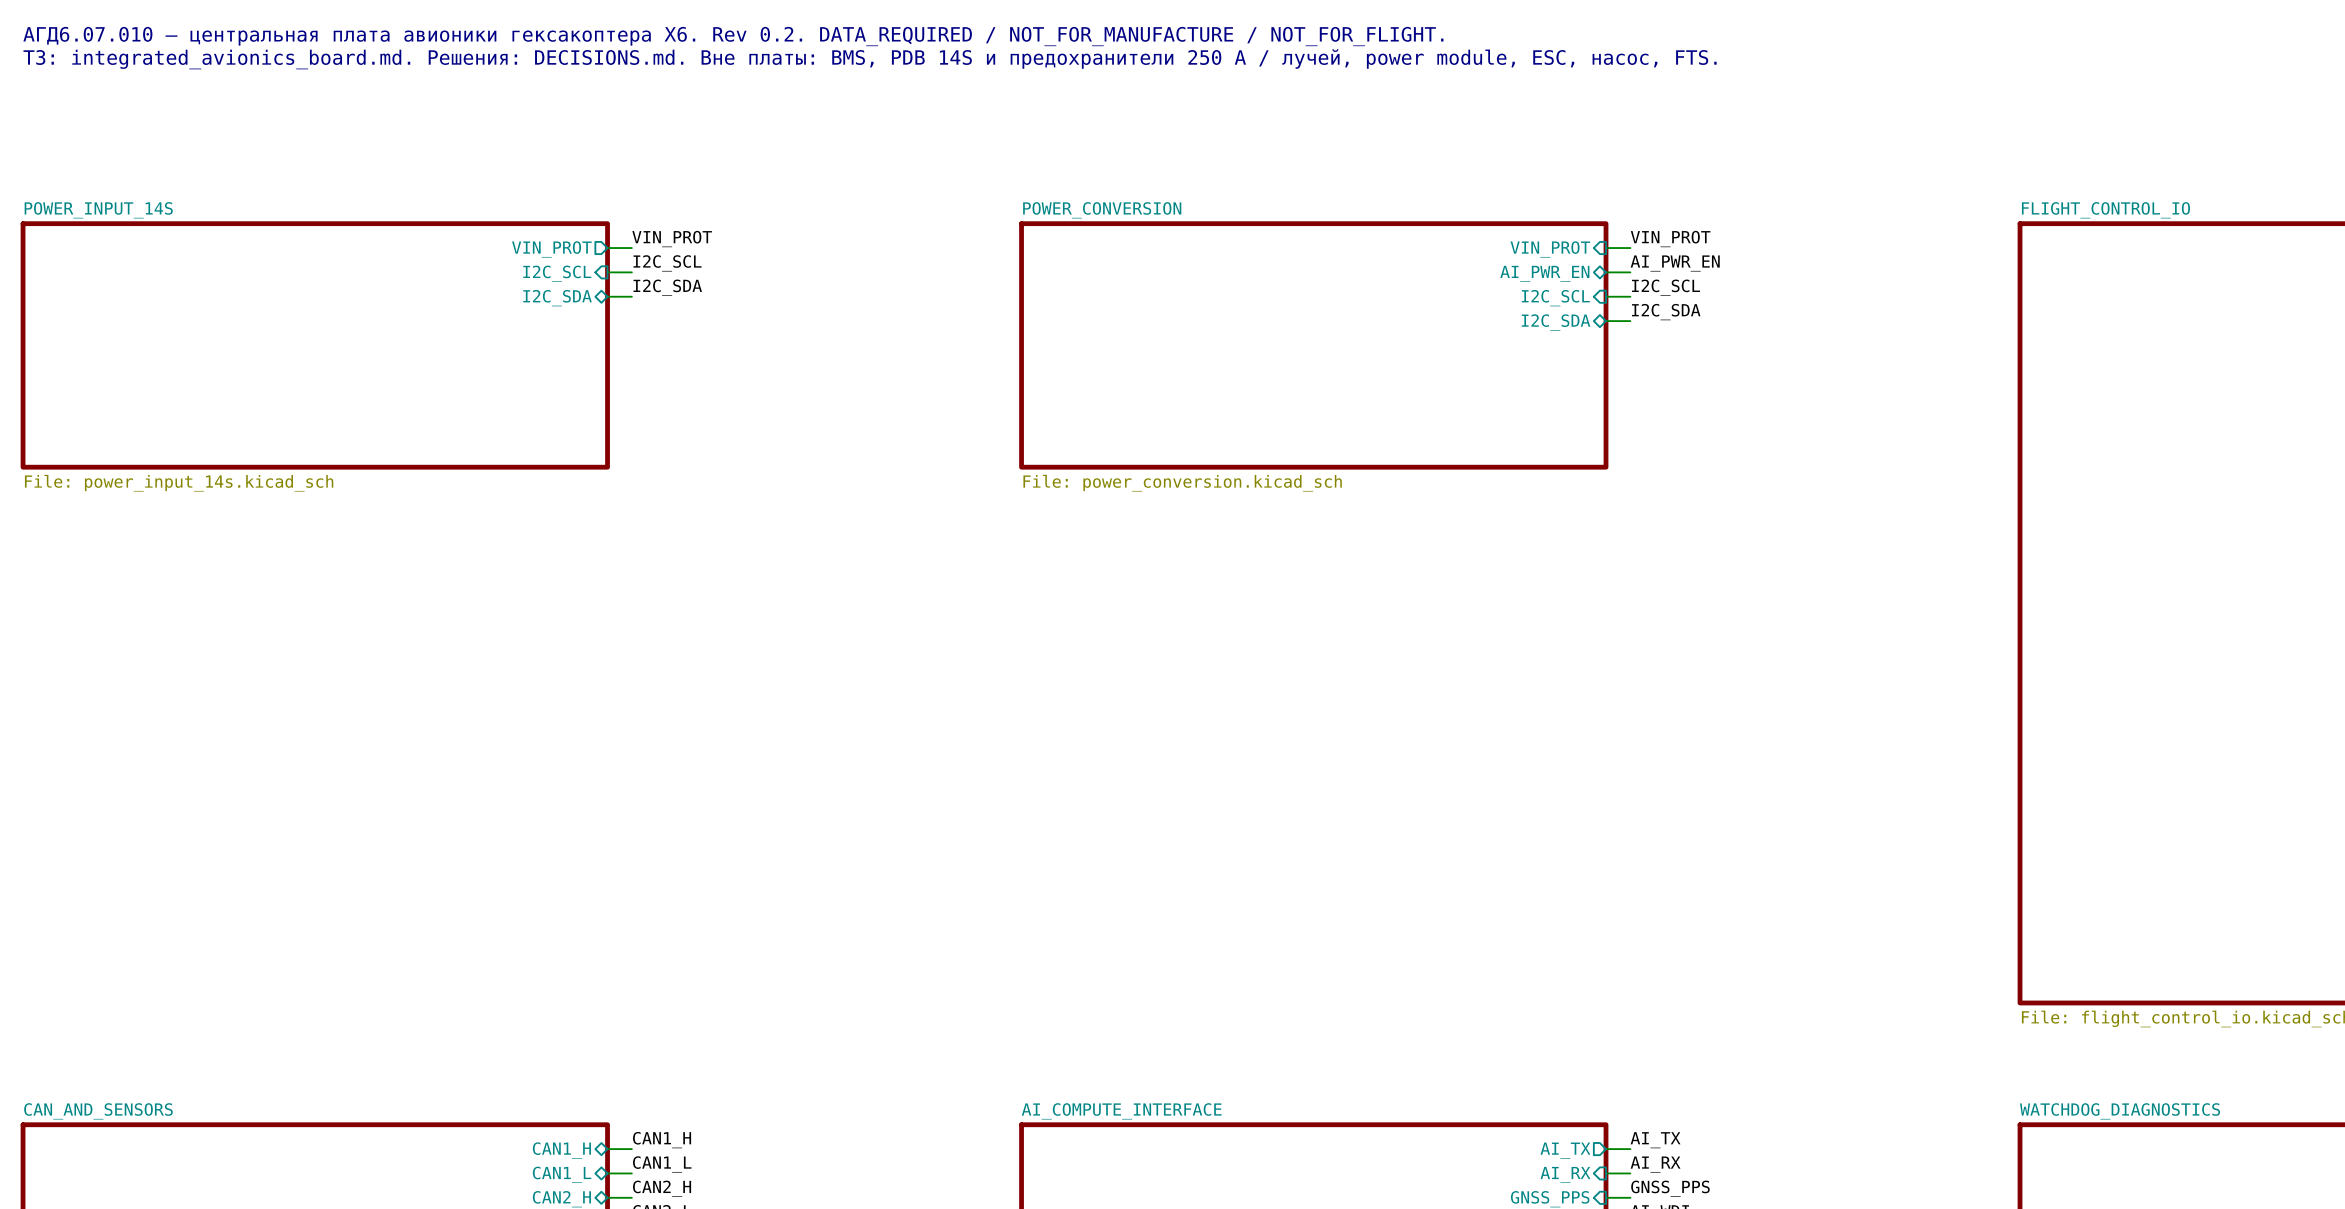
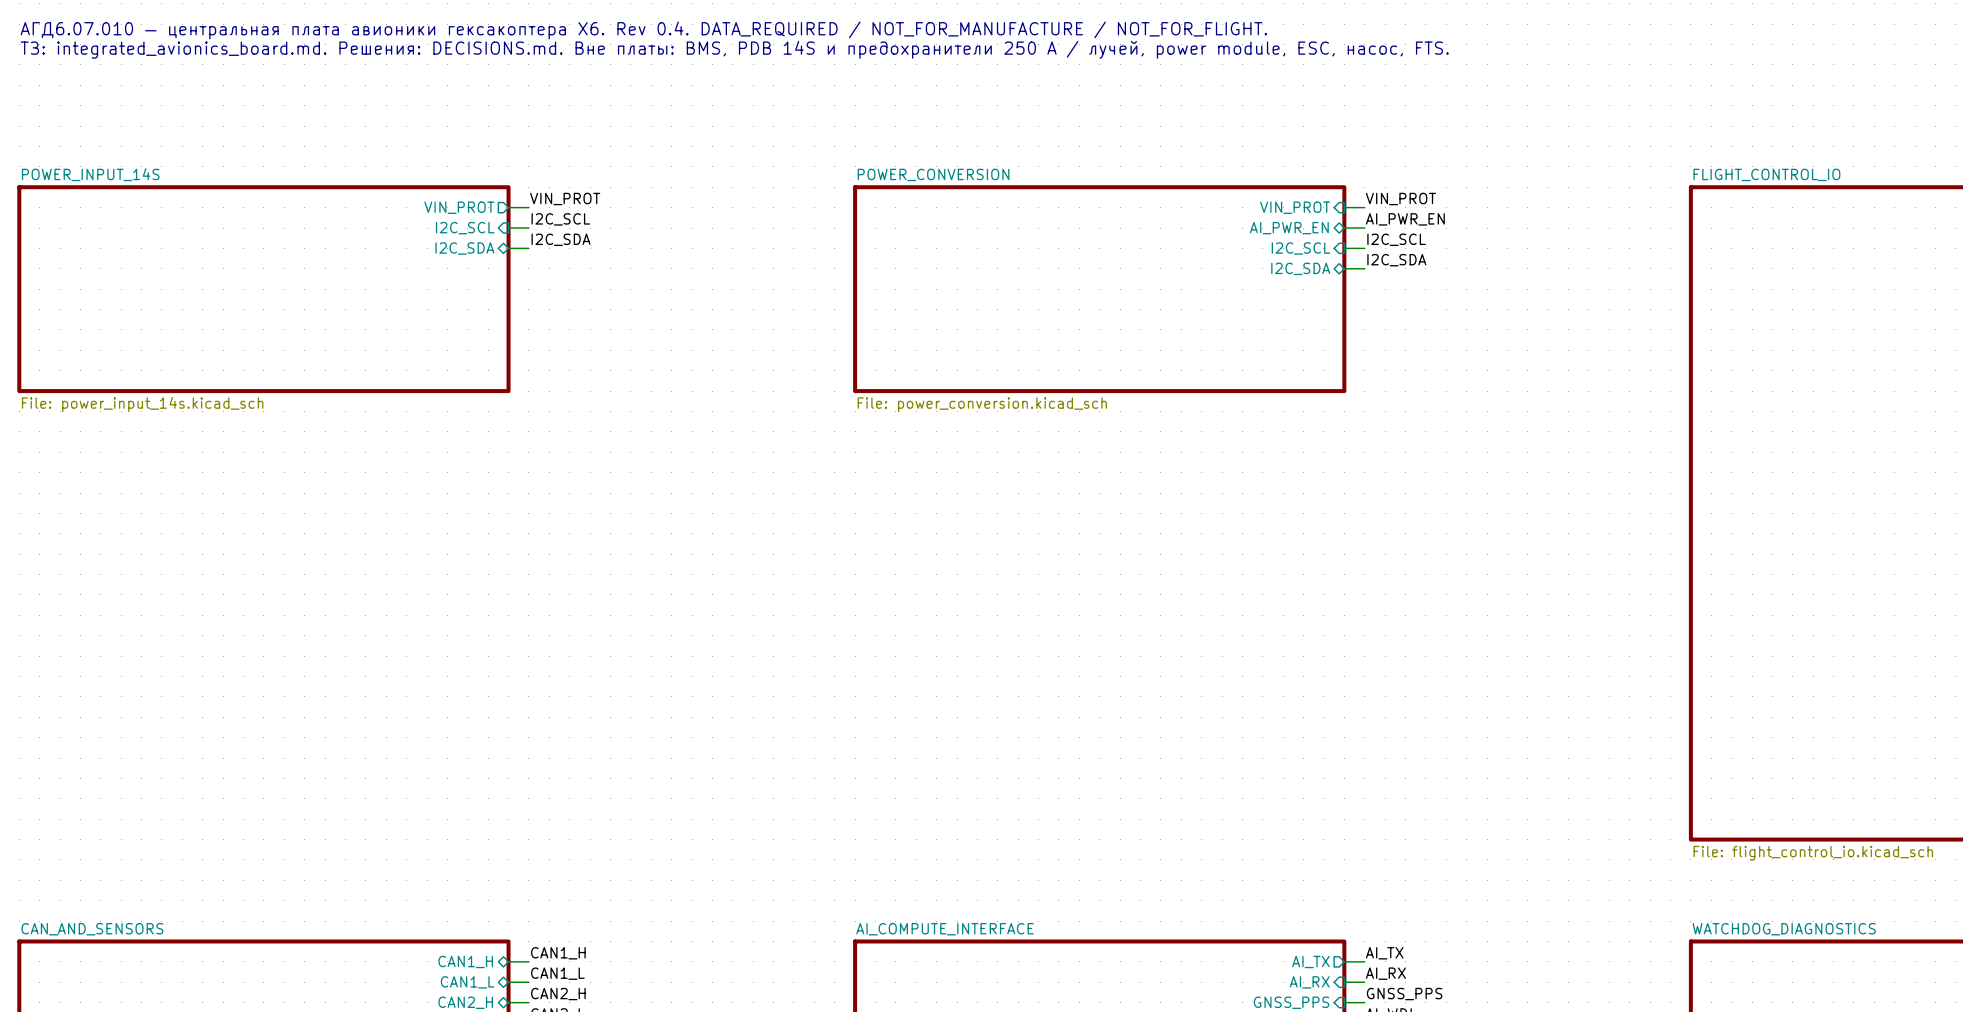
text: АГД6.07.010 — центральная плата авионики гексакоптера X6. Rev 0.2. DATA_REQUIRED / NOT_FOR_MANUFACTURE / NOT_FOR_FLIGHT. (733, 36) -> АГД6.07.010 — центральная плата авионики гексакоптера X6. Rev 0.4. DATA_REQUIRED / NOT_FOR_MANUFACTURE / NOT_FOR_FLIGHT. (643, 30)

